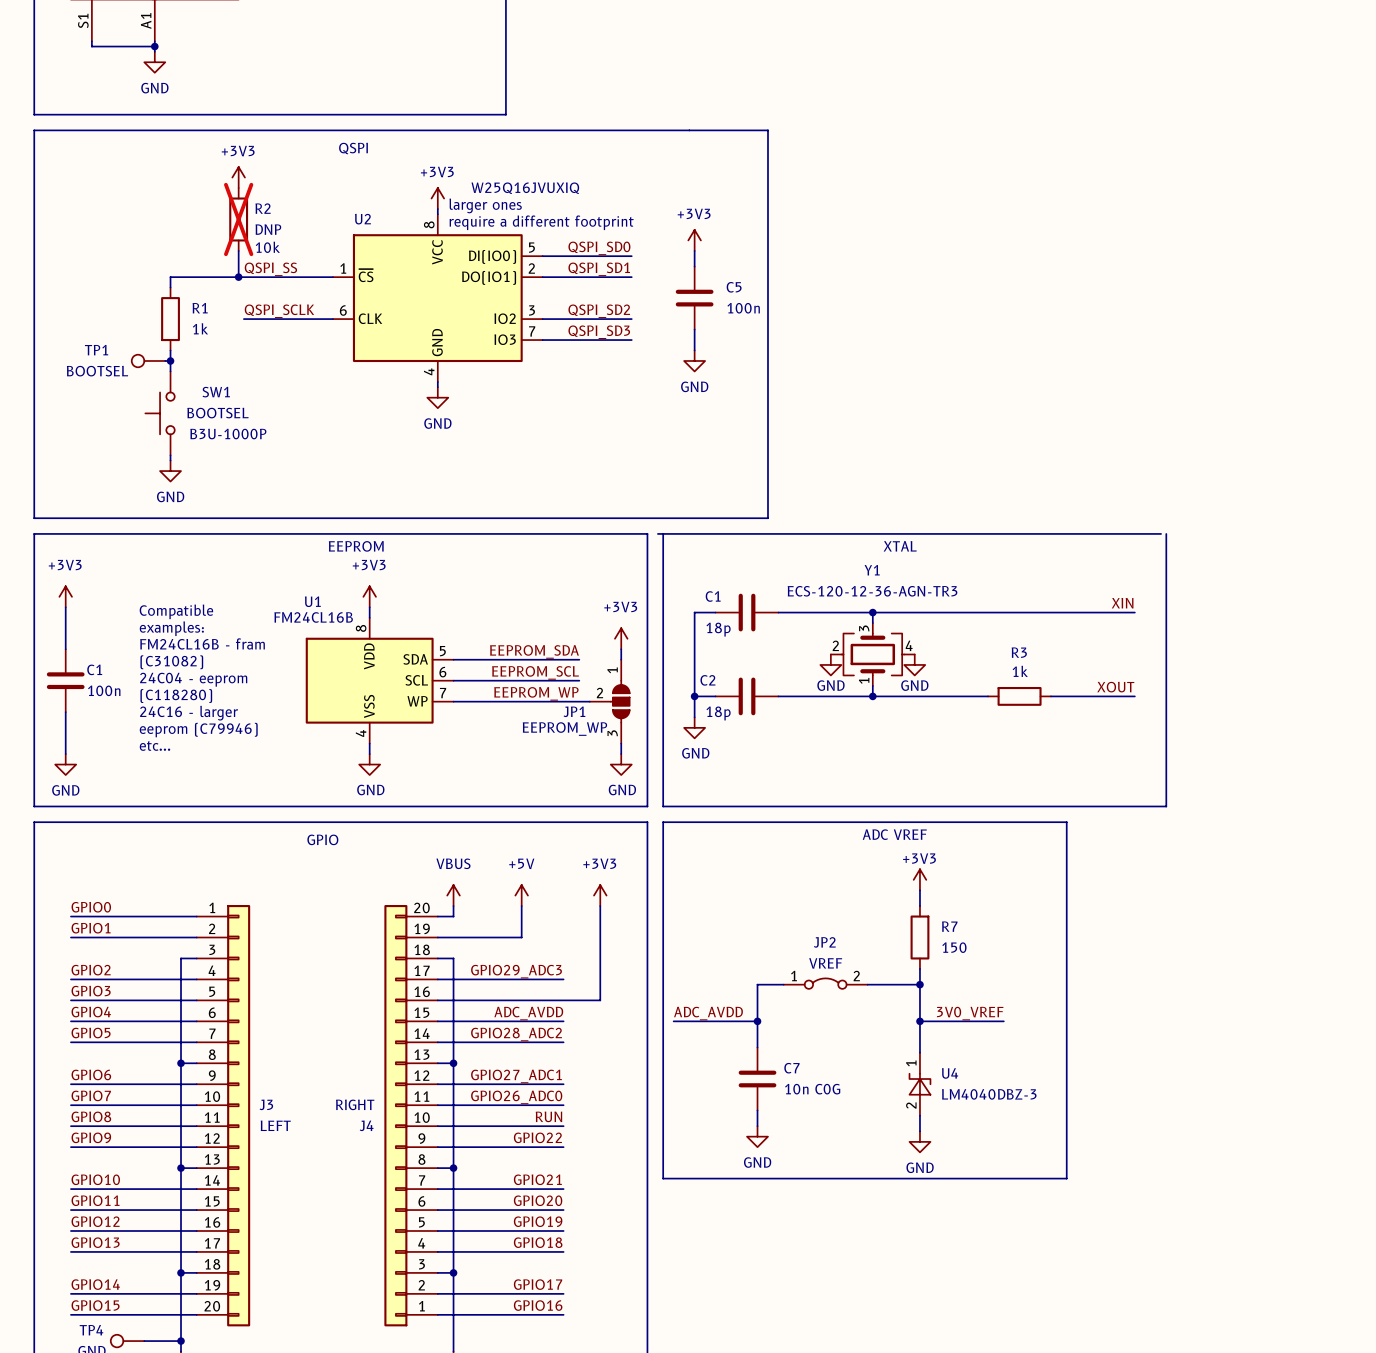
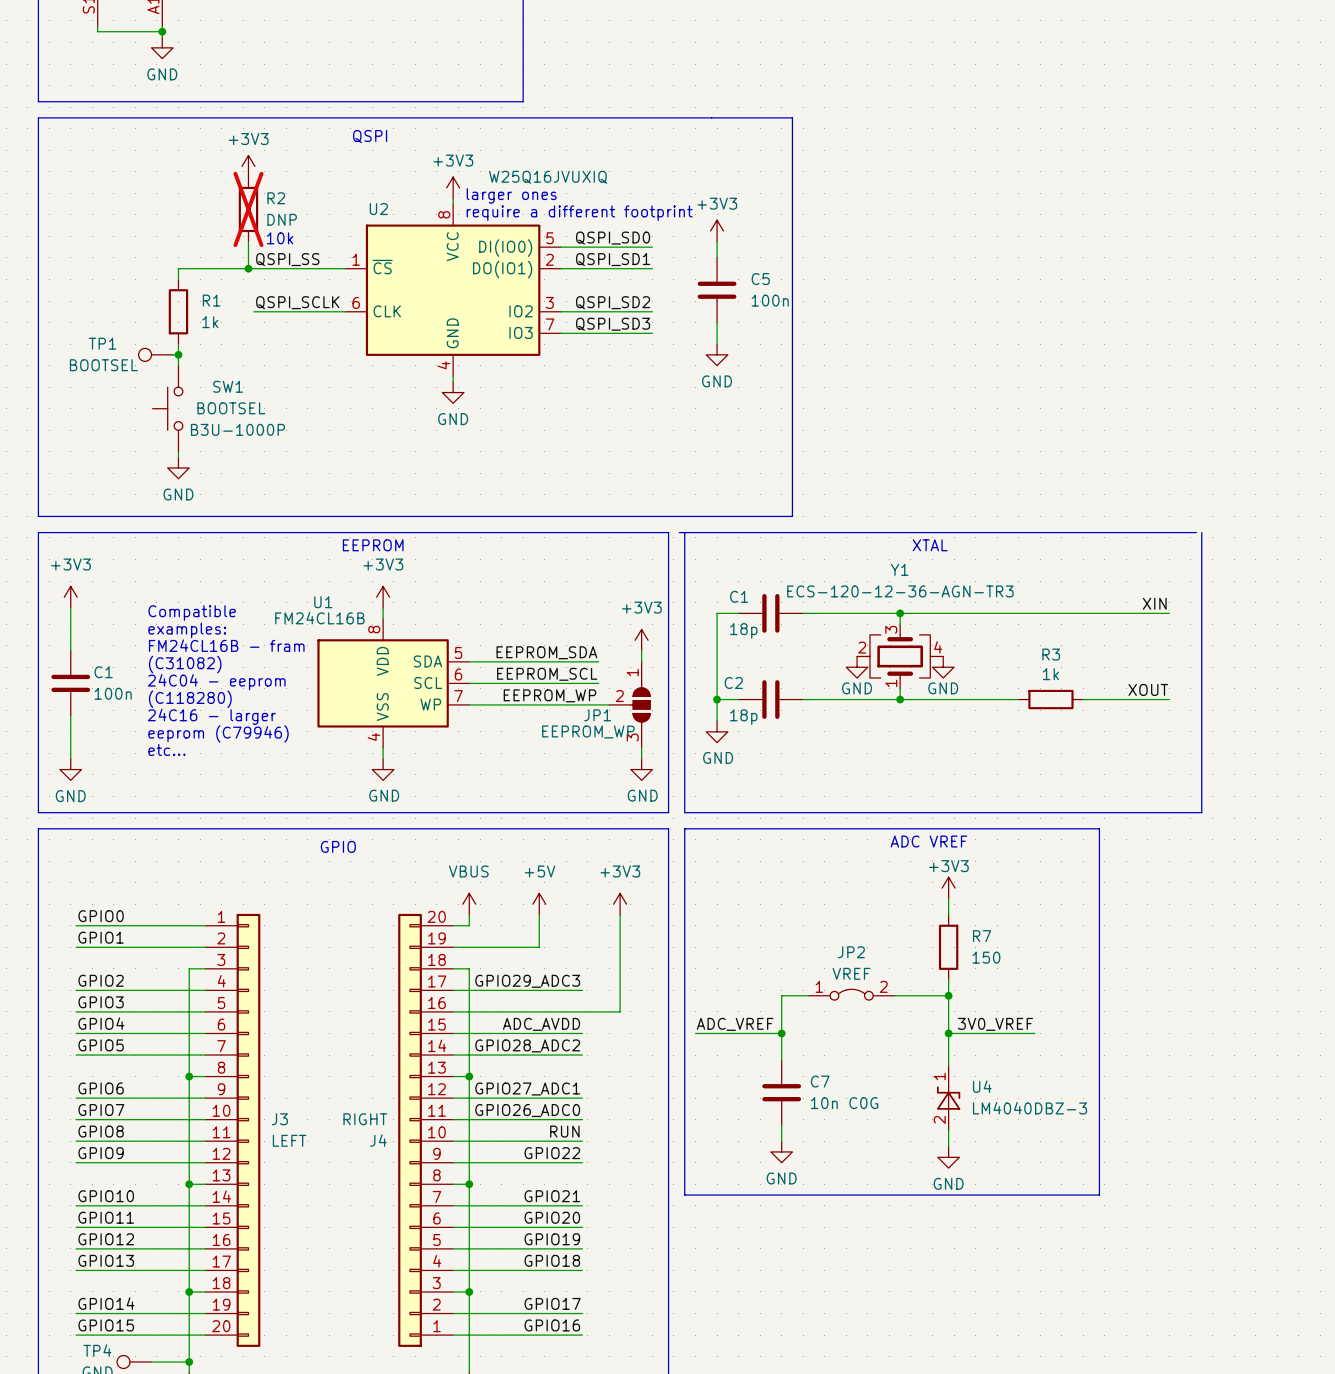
label: ADC_AVDD (708, 1013) -> ADC_VREF (735, 1024)

